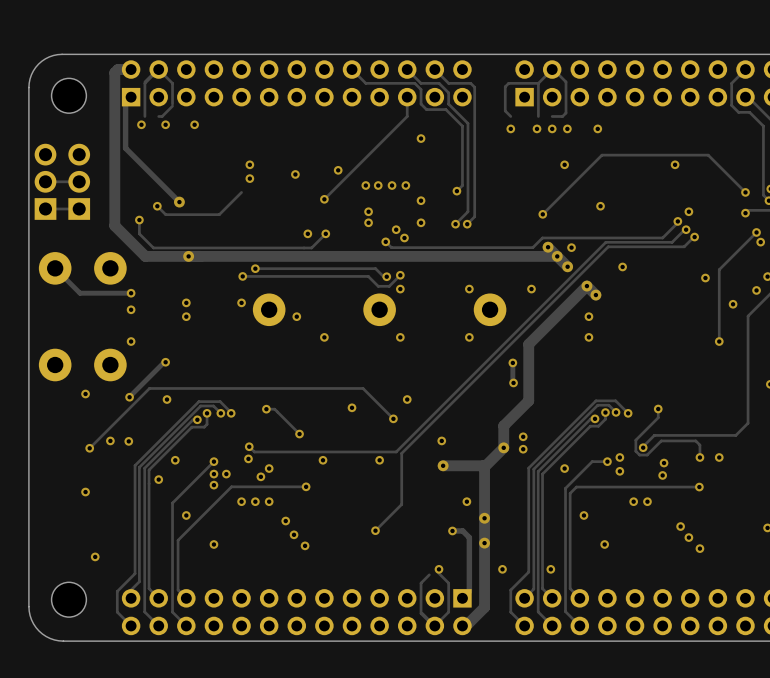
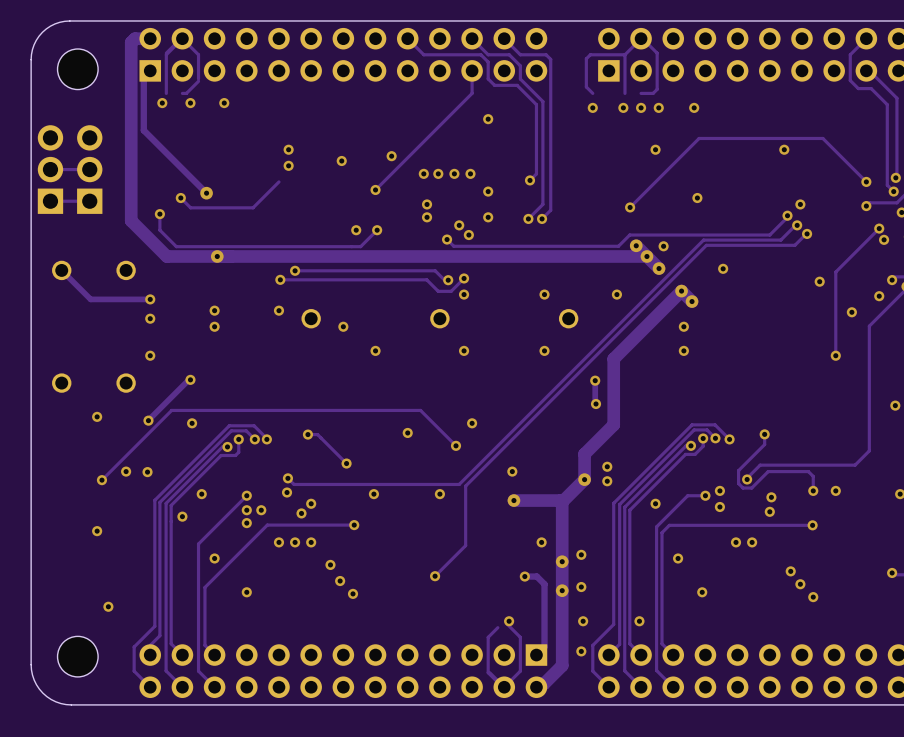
part footprint: [38, 252, 72, 285] -> [52, 260, 72, 281]
part footprint: [94, 252, 127, 285] -> [116, 260, 136, 281]
part footprint: [252, 293, 286, 327] -> [301, 309, 321, 329]
part footprint: [363, 293, 396, 327] -> [430, 309, 450, 329]
part footprint: [473, 293, 507, 327] -> [558, 309, 579, 329]
part footprint: [38, 348, 72, 382] -> [52, 373, 72, 393]
part footprint: [94, 348, 127, 382] -> [116, 373, 136, 393]
via: none -> (581, 554)
via: none -> (581, 587)
via: none -> (581, 651)

